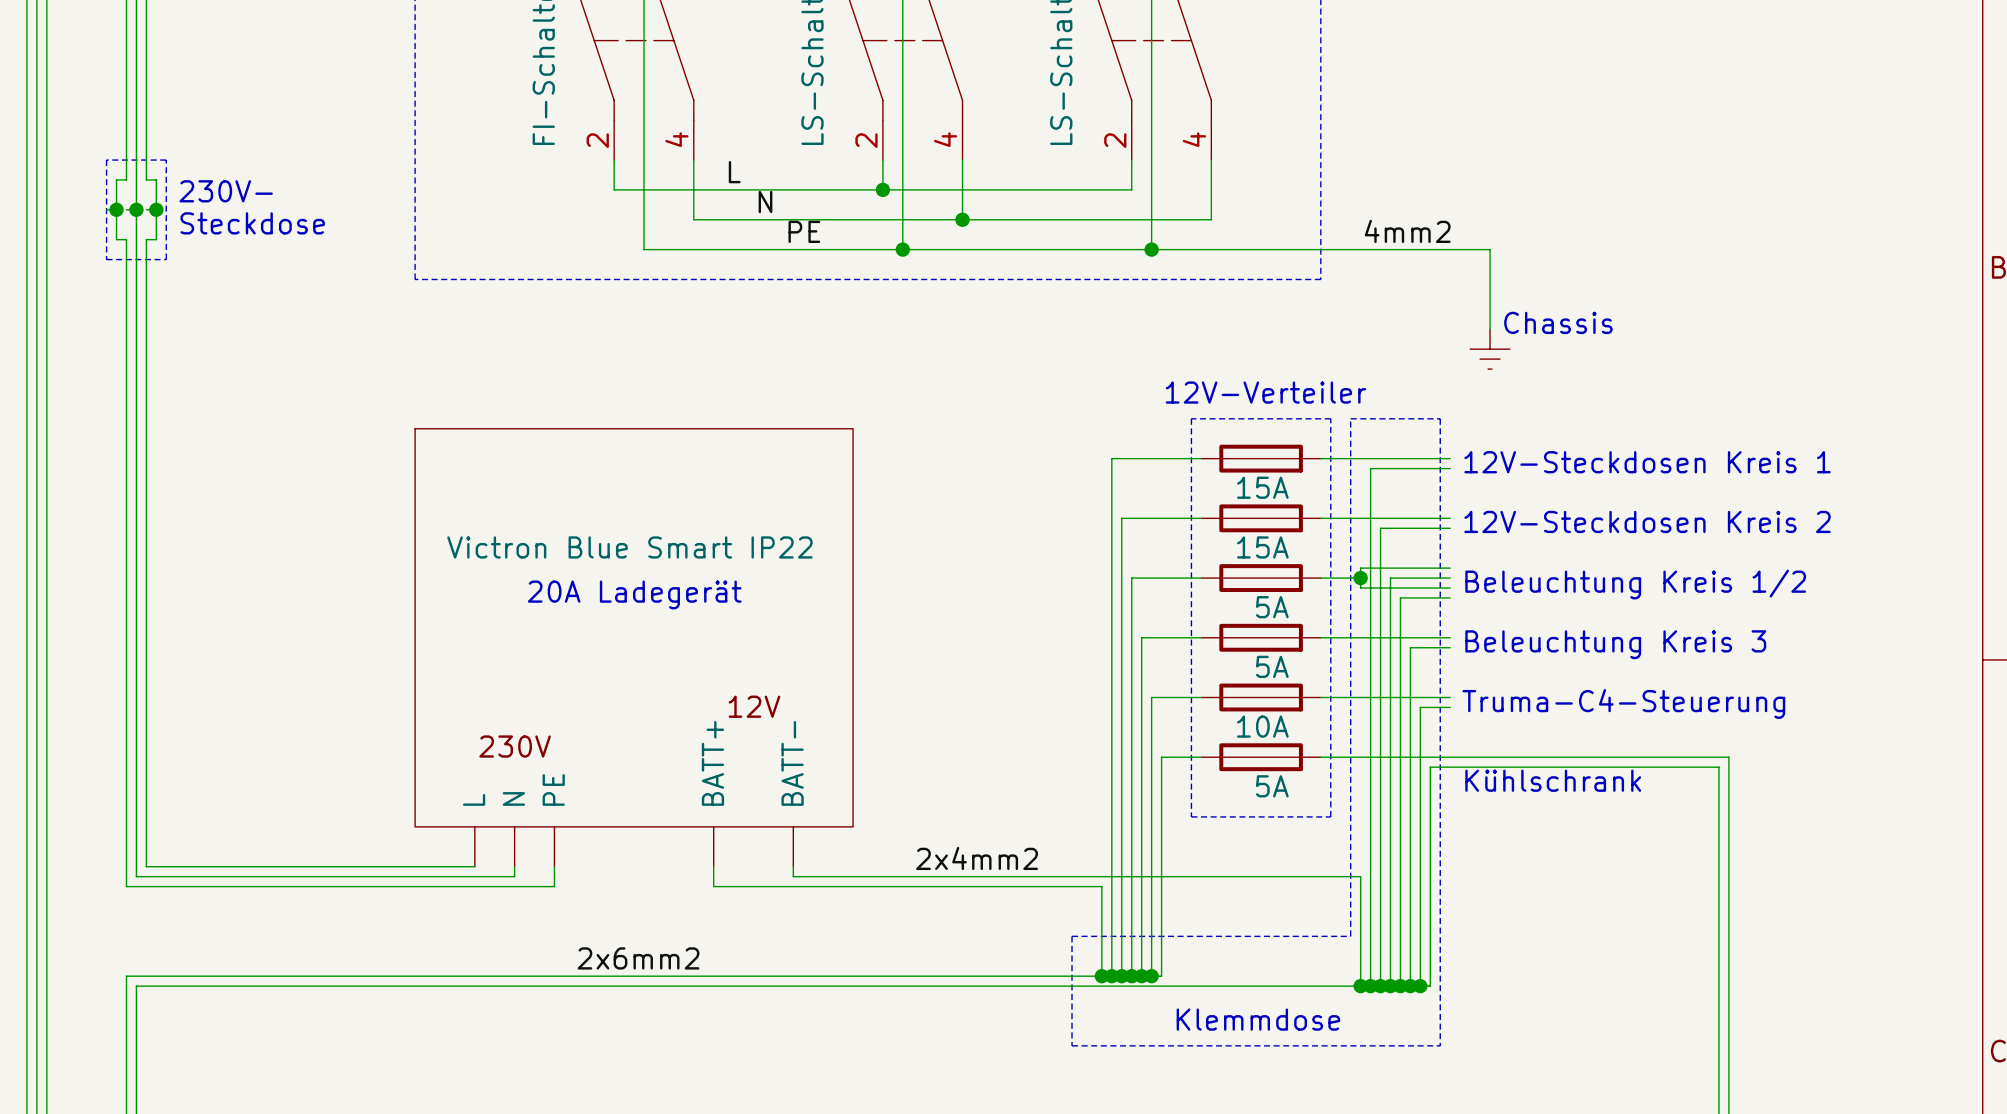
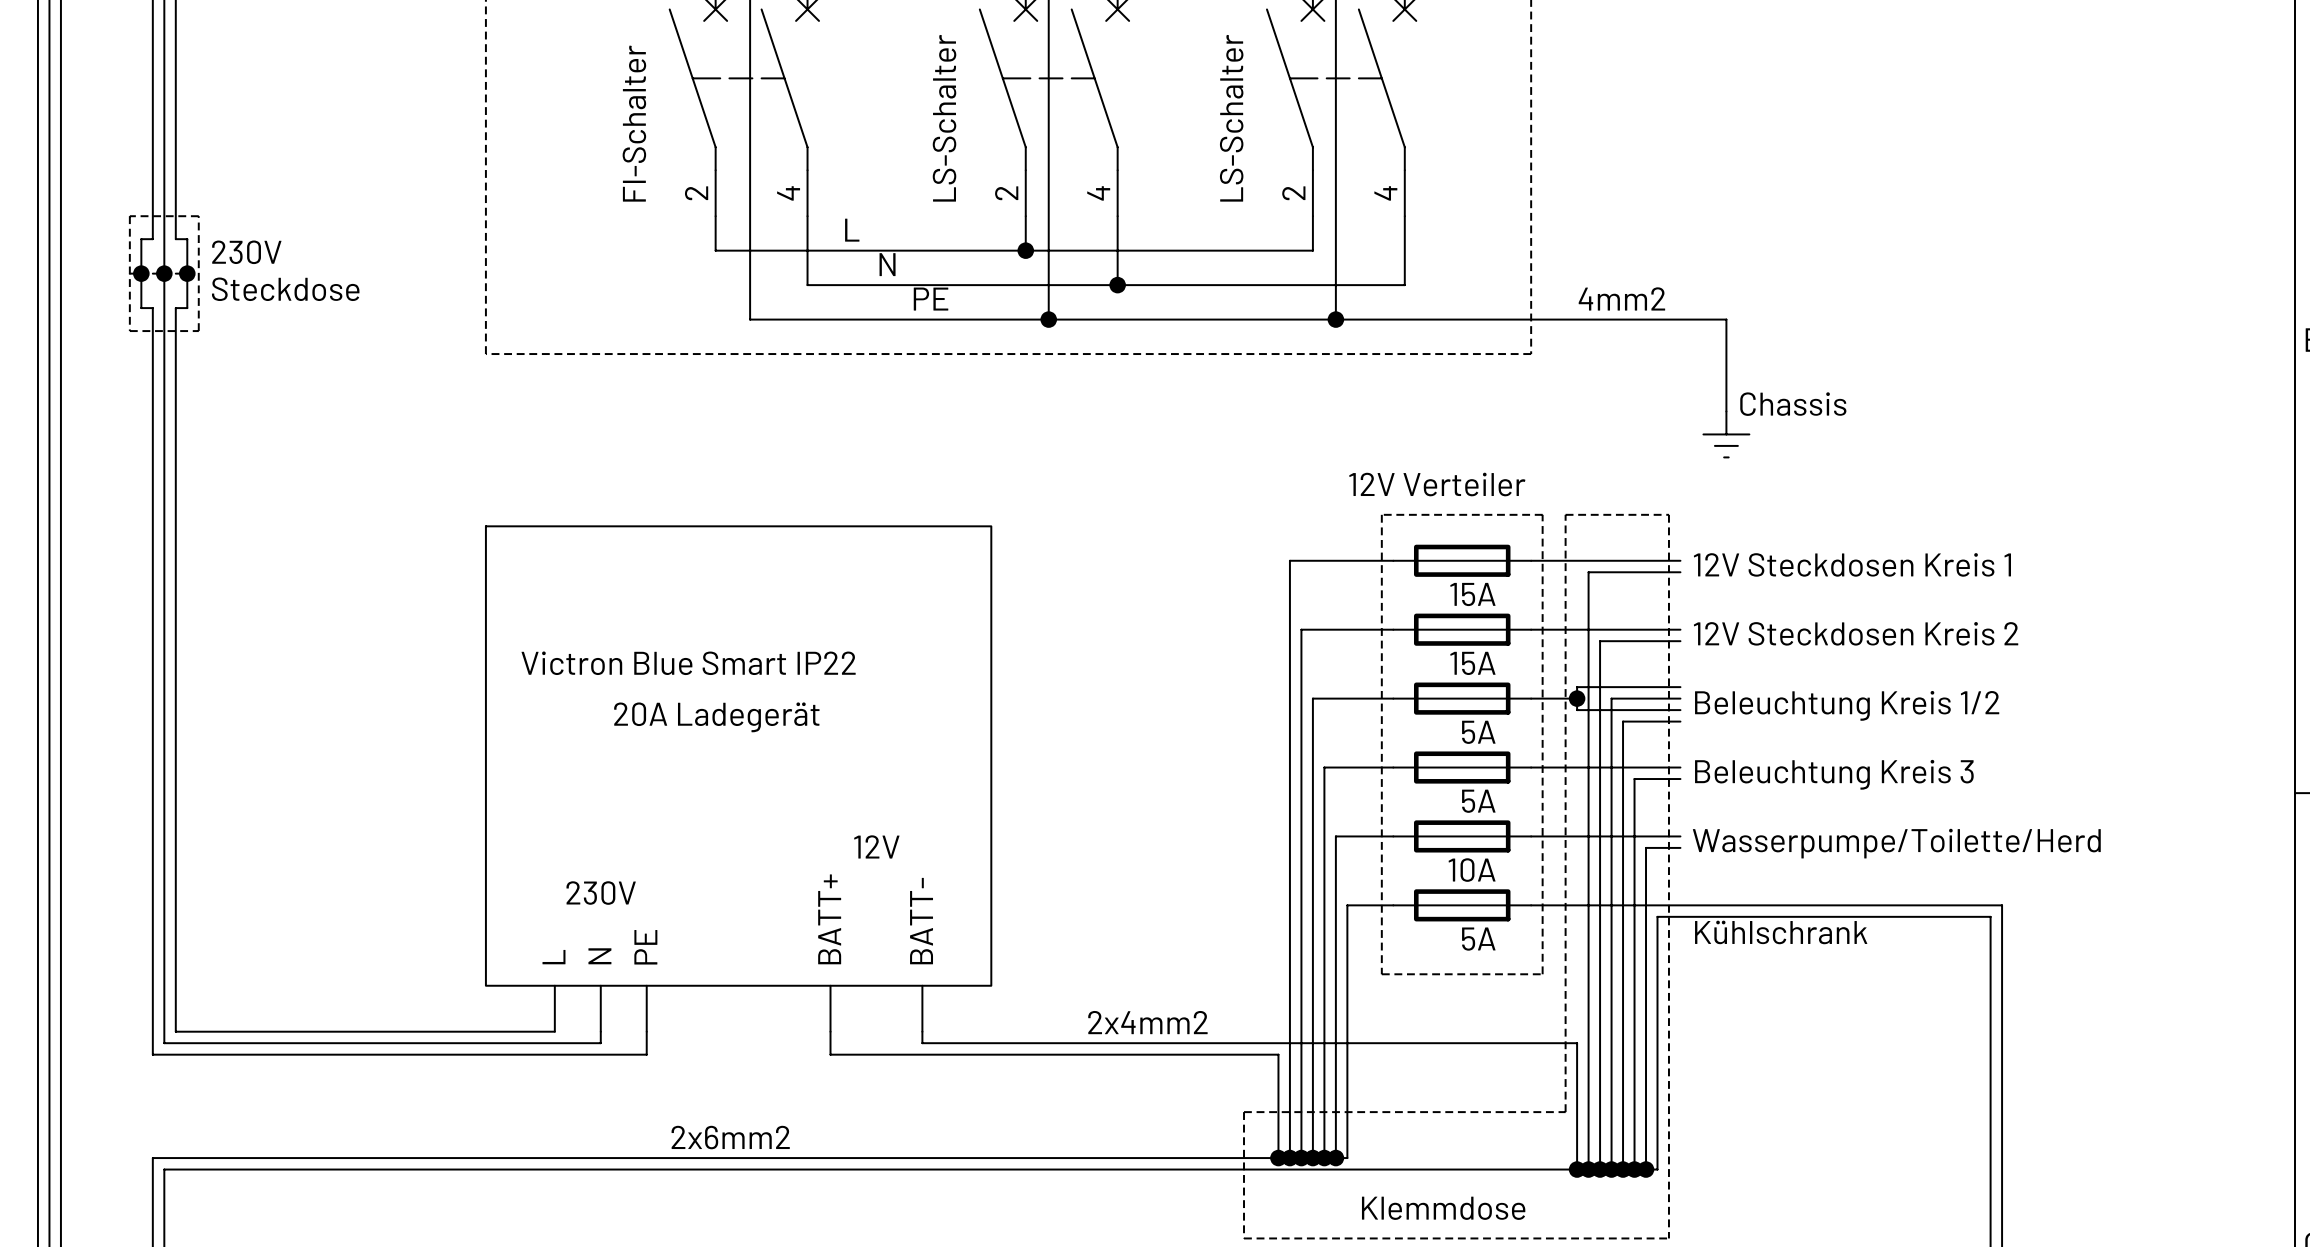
text: 230V- (226, 191) -> 230V (246, 252)
text: 12V-Verteiler (1266, 392) -> 12V Verteiler (1437, 484)
text: 12V-Steckdosen Kreis 1 (1647, 462) -> 12V Steckdosen Kreis 1 (1852, 564)
text: 12V-Steckdosen Kreis 2 (1647, 521) -> 12V Steckdosen Kreis 2 (1856, 633)
text: Truma-C4-Steuerung (1623, 703) -> Wasserpumpe/Toilette/Herd (1896, 843)

